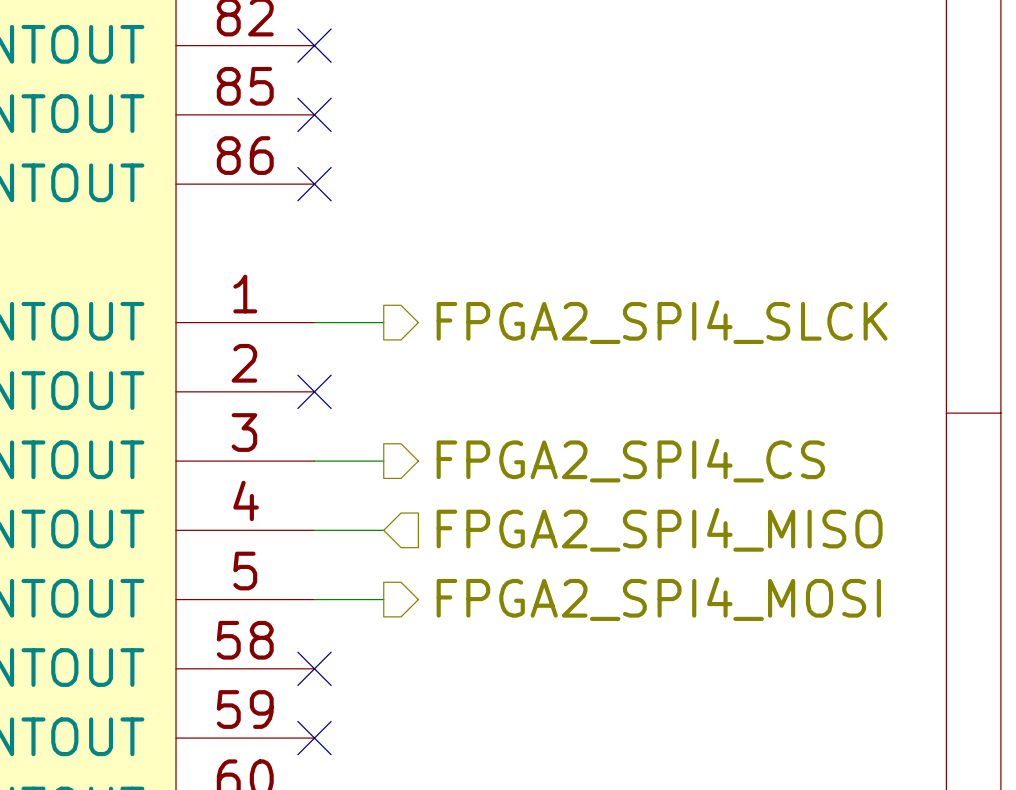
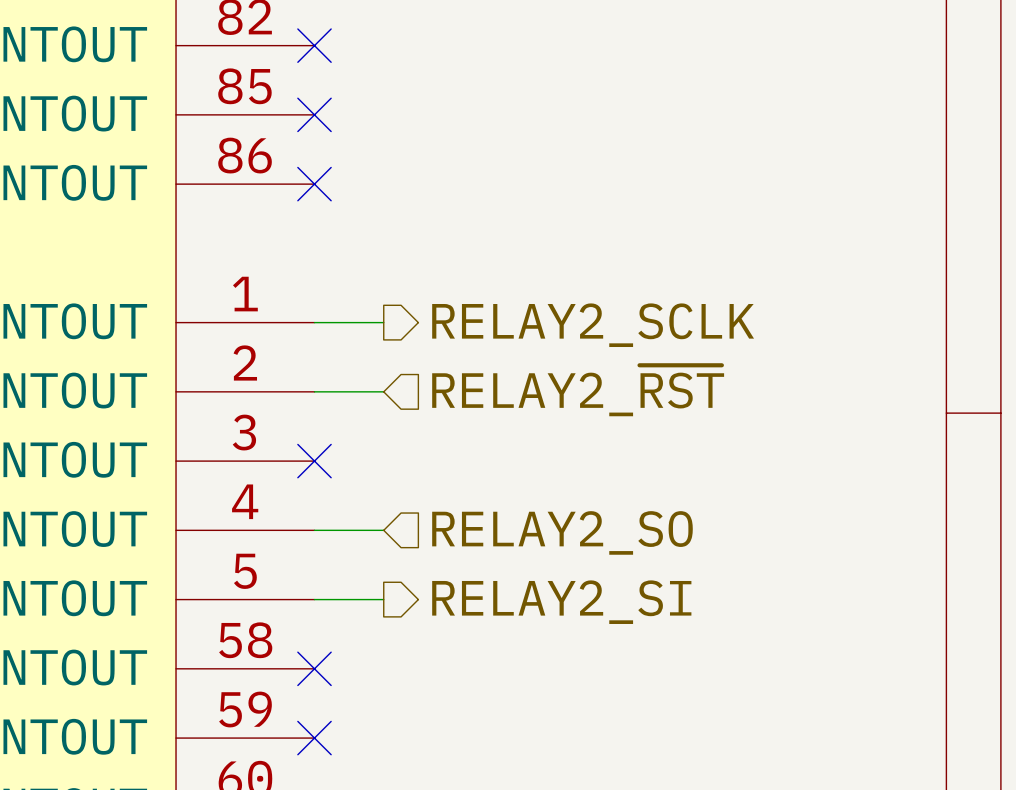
hierarchical label: FPGA2_SPI4_SLCK (662, 322) -> RELAY2_SCLK (593, 325)
hierarchical label: none -> RELAY2_~{RST} (578, 390)
no-connect mark position: (314, 391) -> (314, 461)
hierarchical label: FPGA2_SPI4_CS (630, 460) -> none
wire: (314, 461) (383, 461) -> (314, 391) (383, 391)
hierarchical label: FPGA2_SPI4_MISO (659, 529) -> RELAY2_SO (562, 532)
hierarchical label: FPGA2_SPI4_MOSI (658, 599) -> RELAY2_SI (561, 602)

